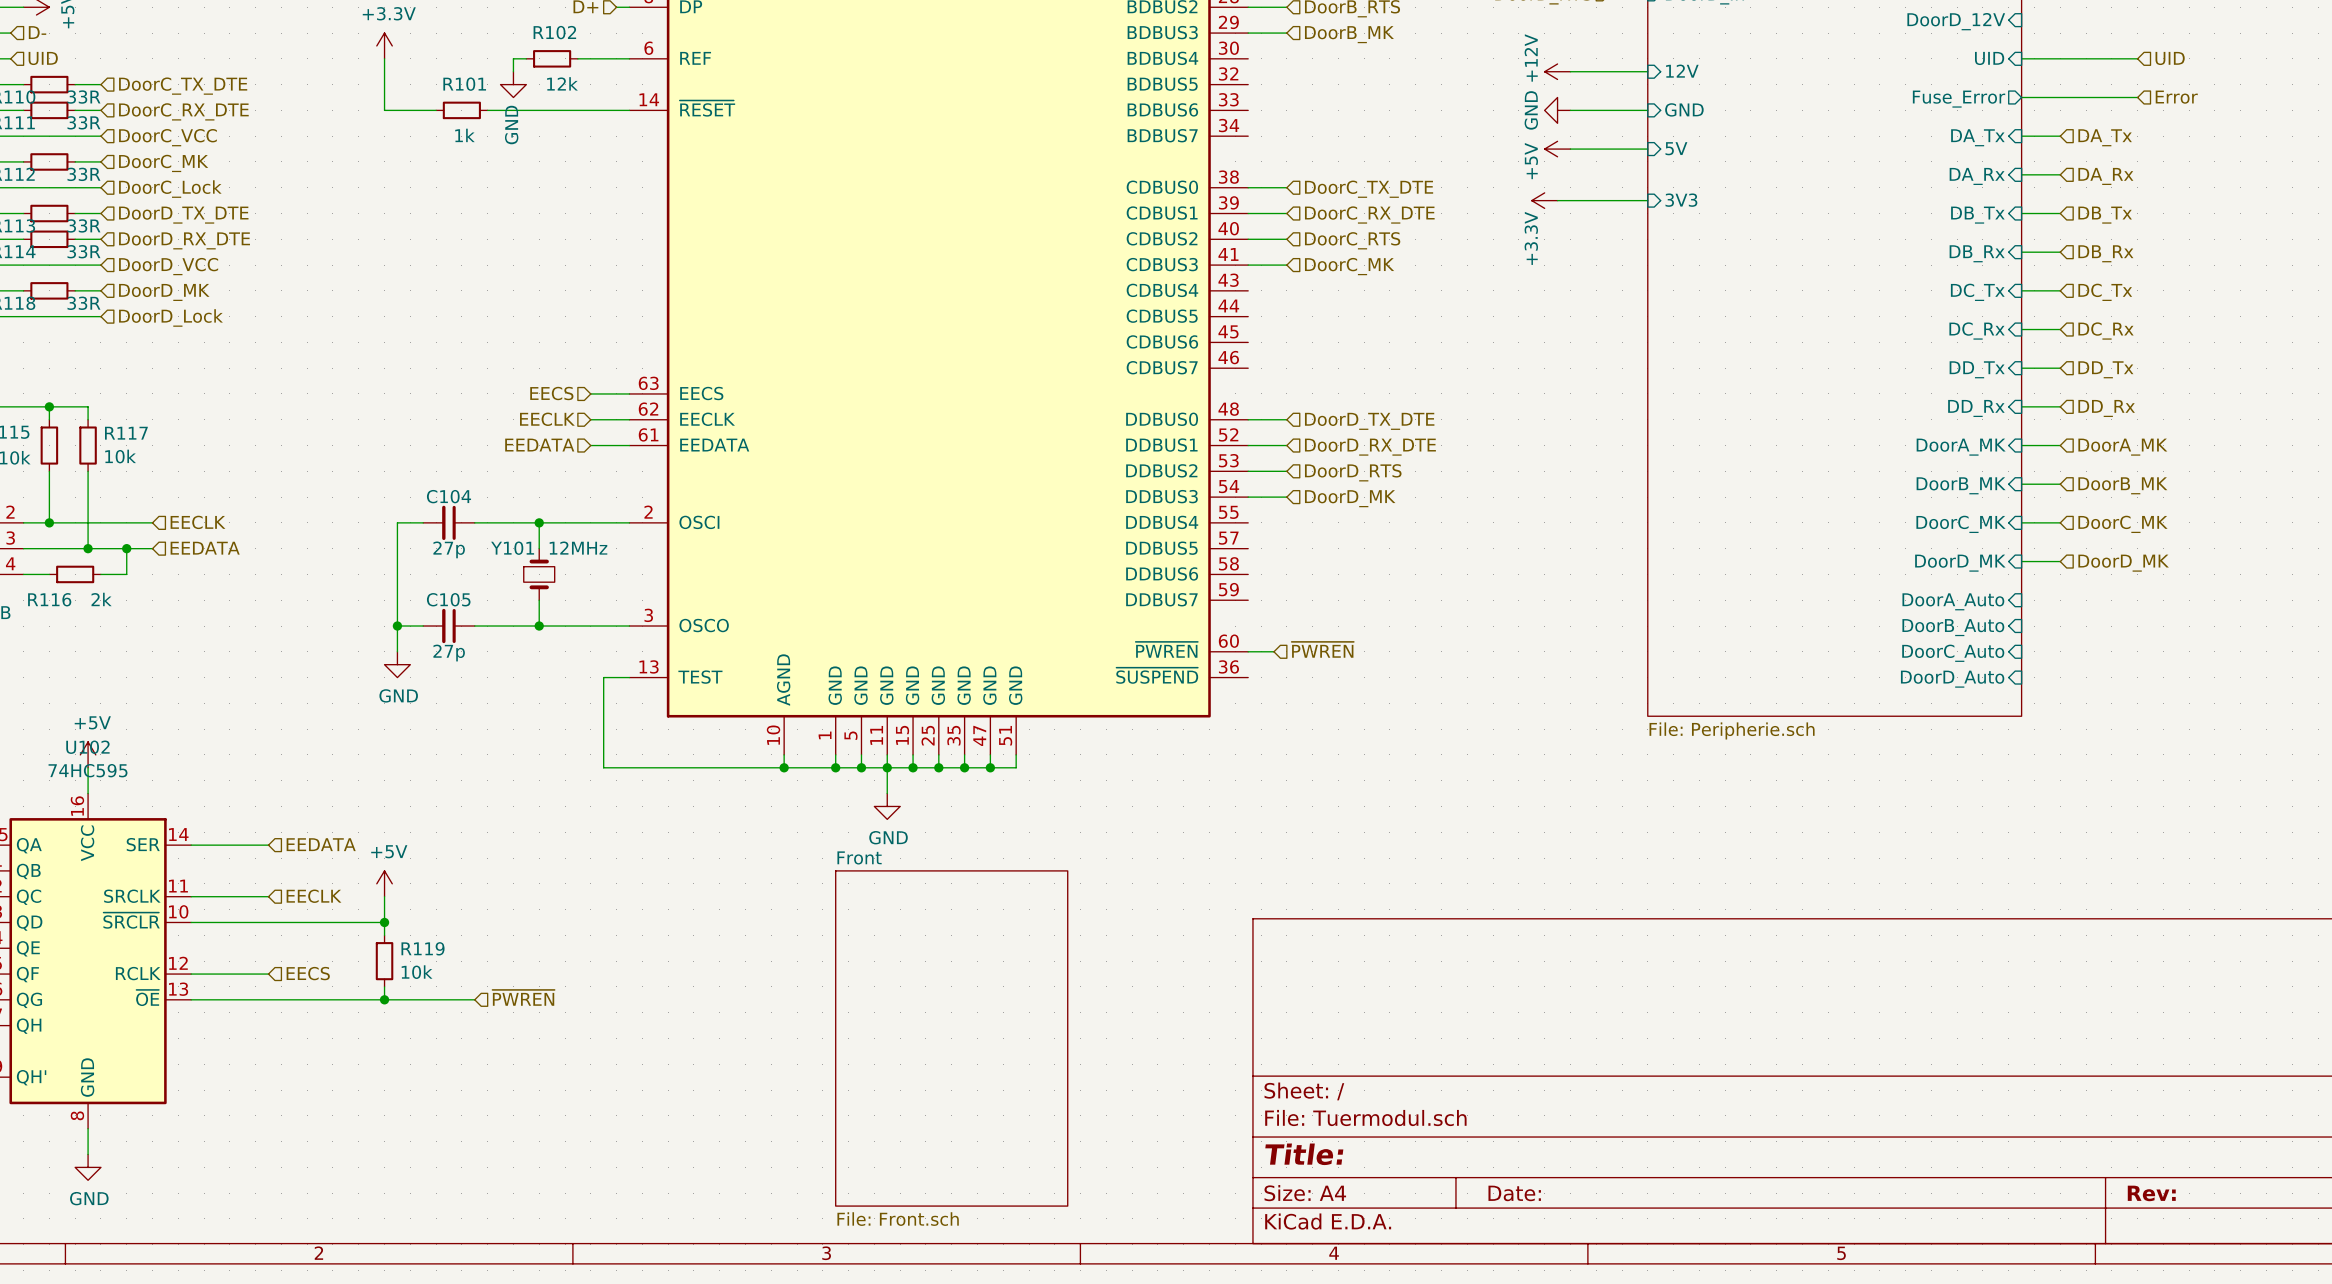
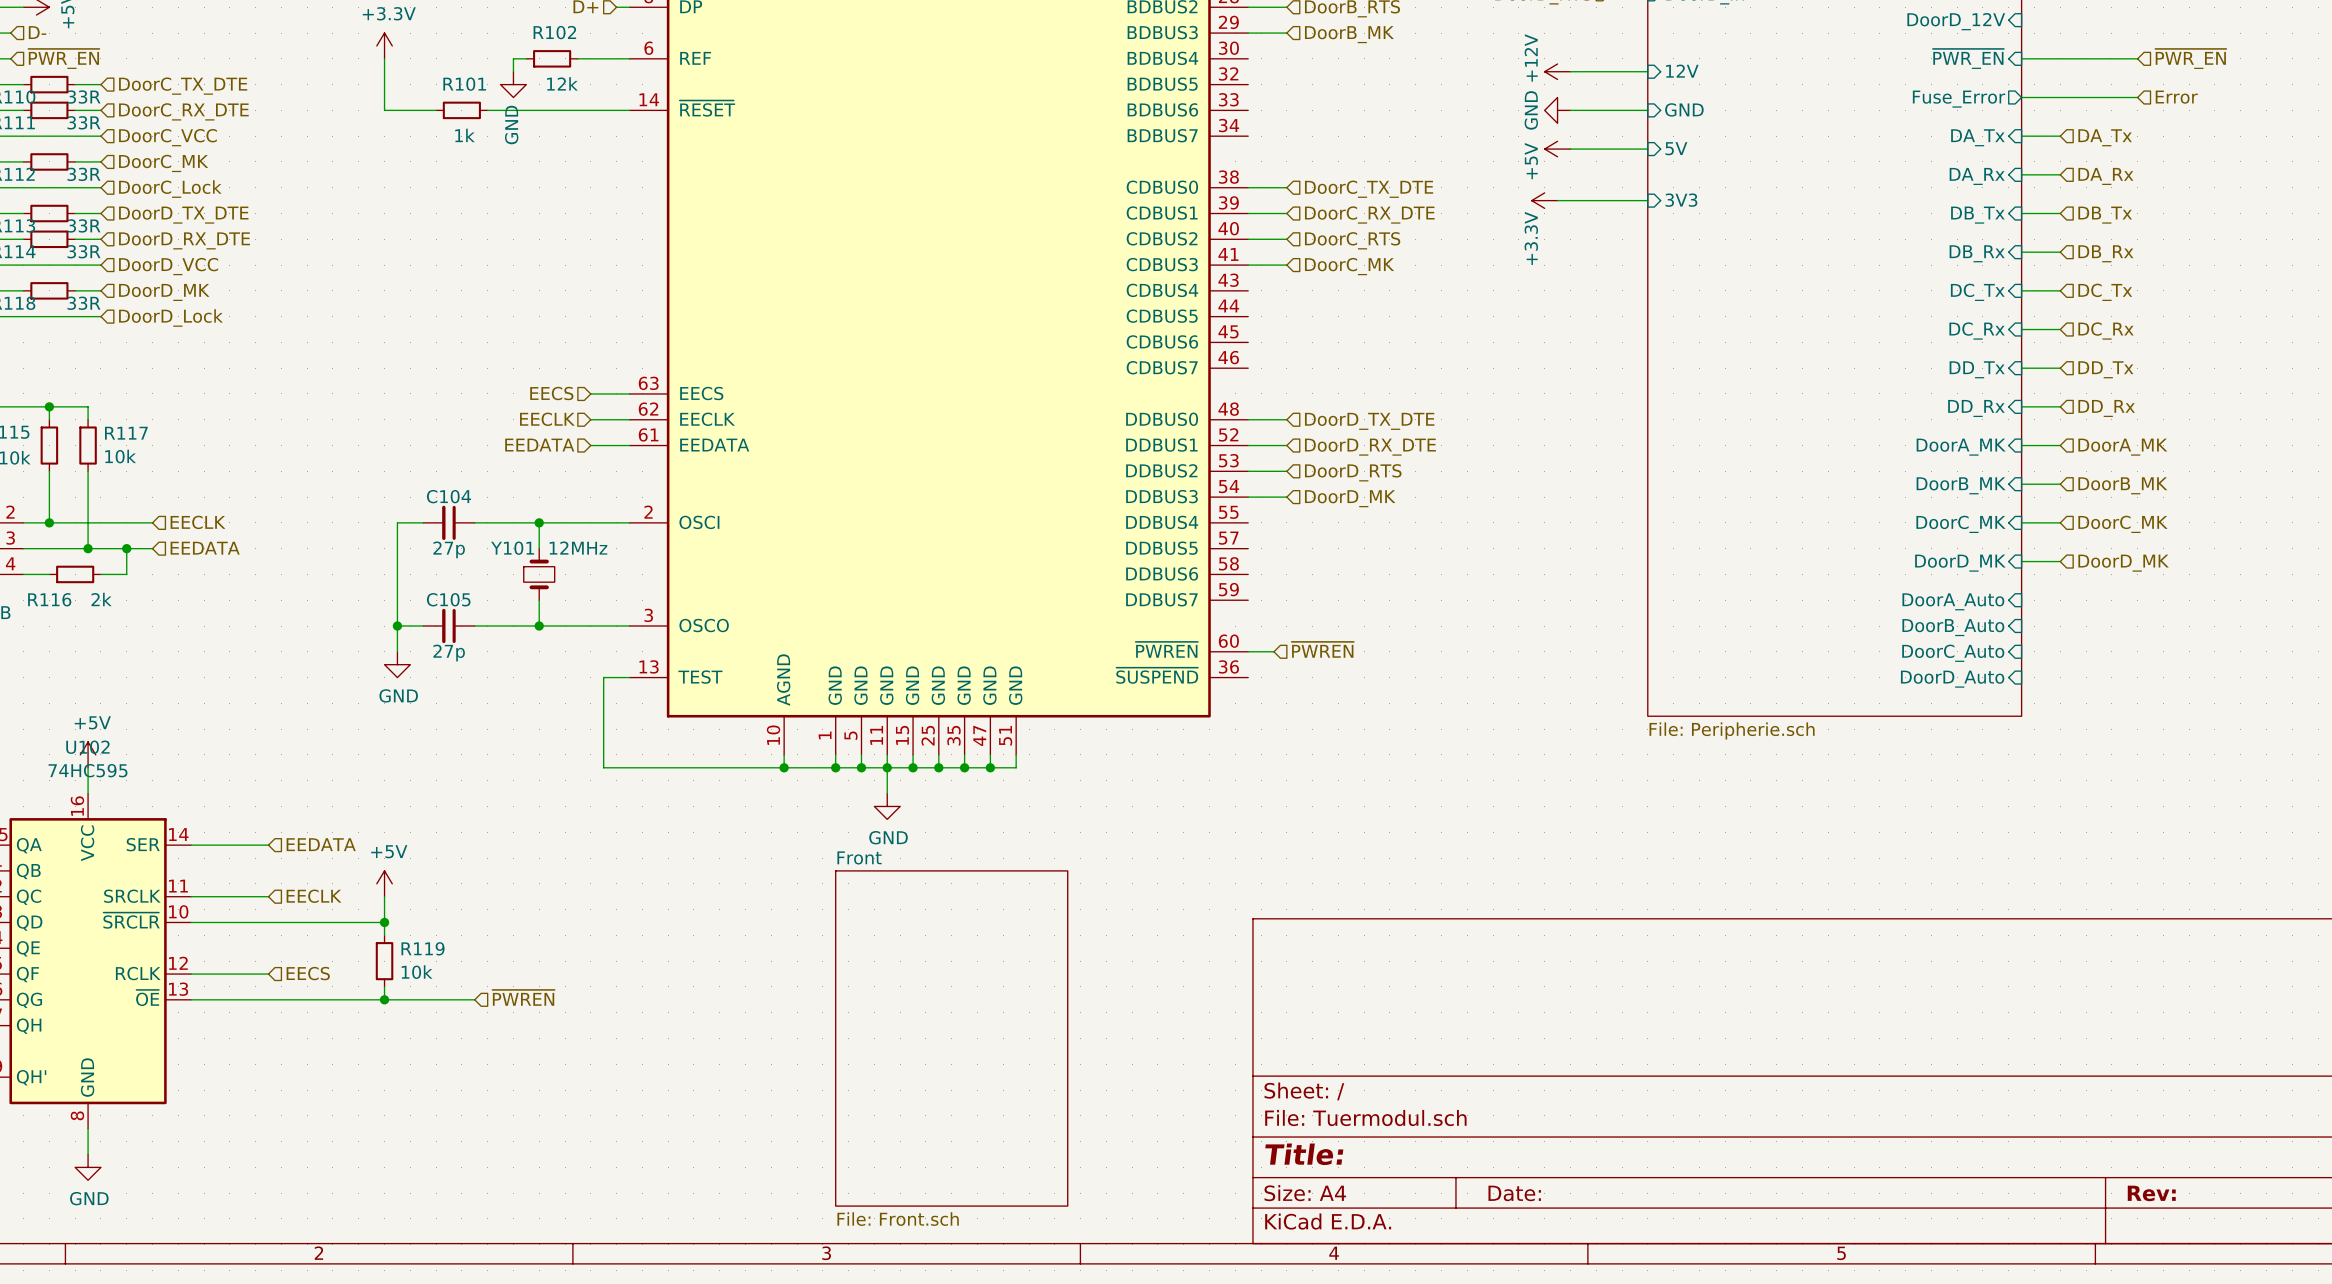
hierarchical label: UID (43, 58) -> ~{PWR_EN} (63, 58)
sheet pin: UID (1989, 58) -> ~{PWR_EN} (1968, 58)
hierarchical label: UID (2170, 58) -> ~{PWR_EN} (2190, 58)

